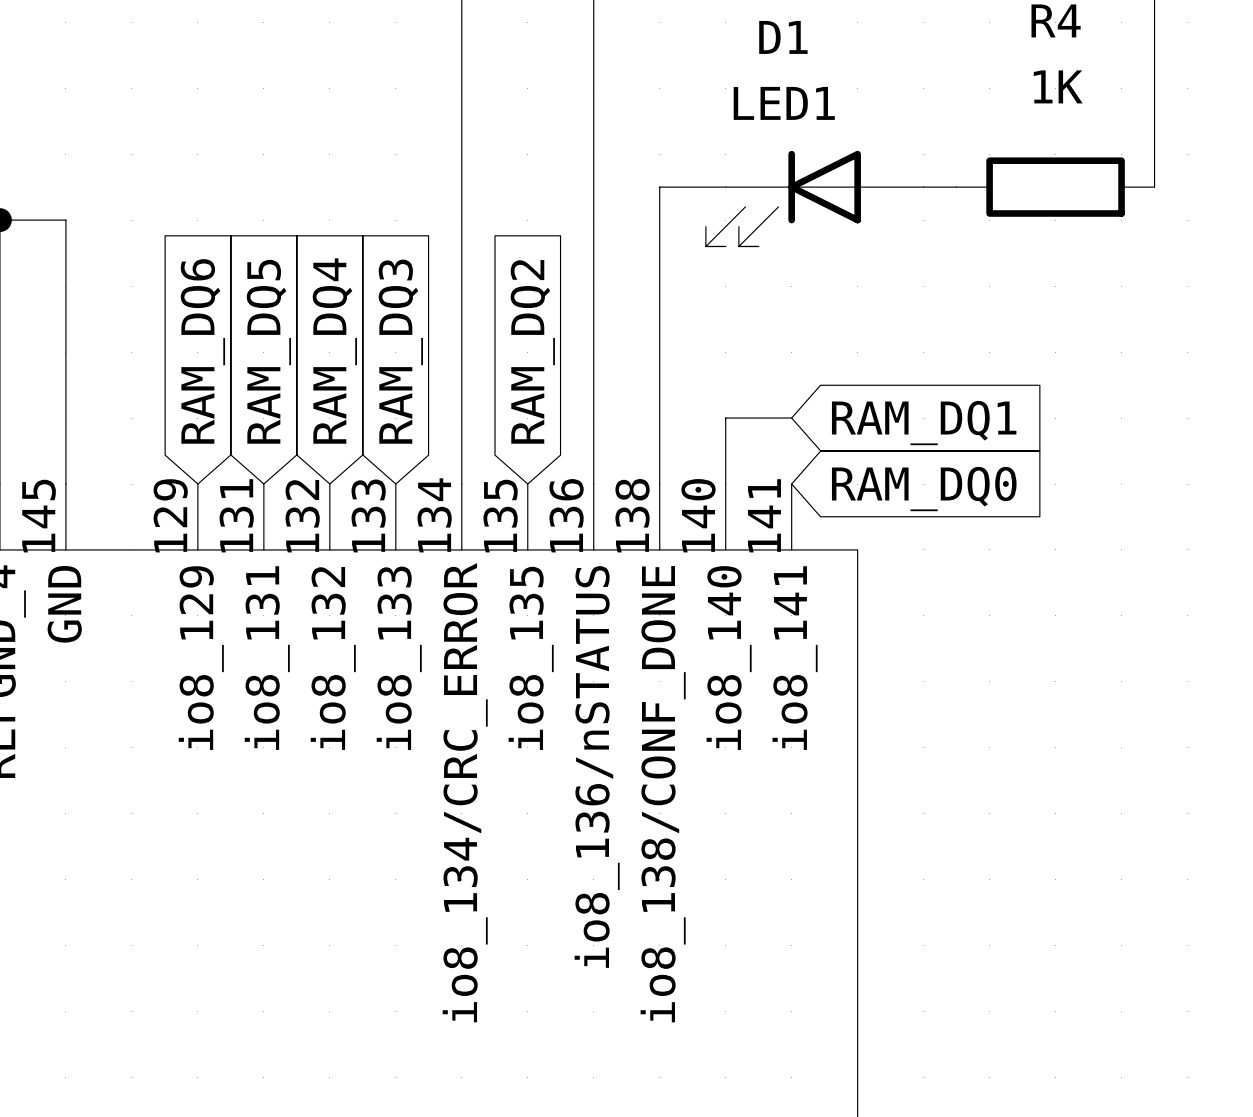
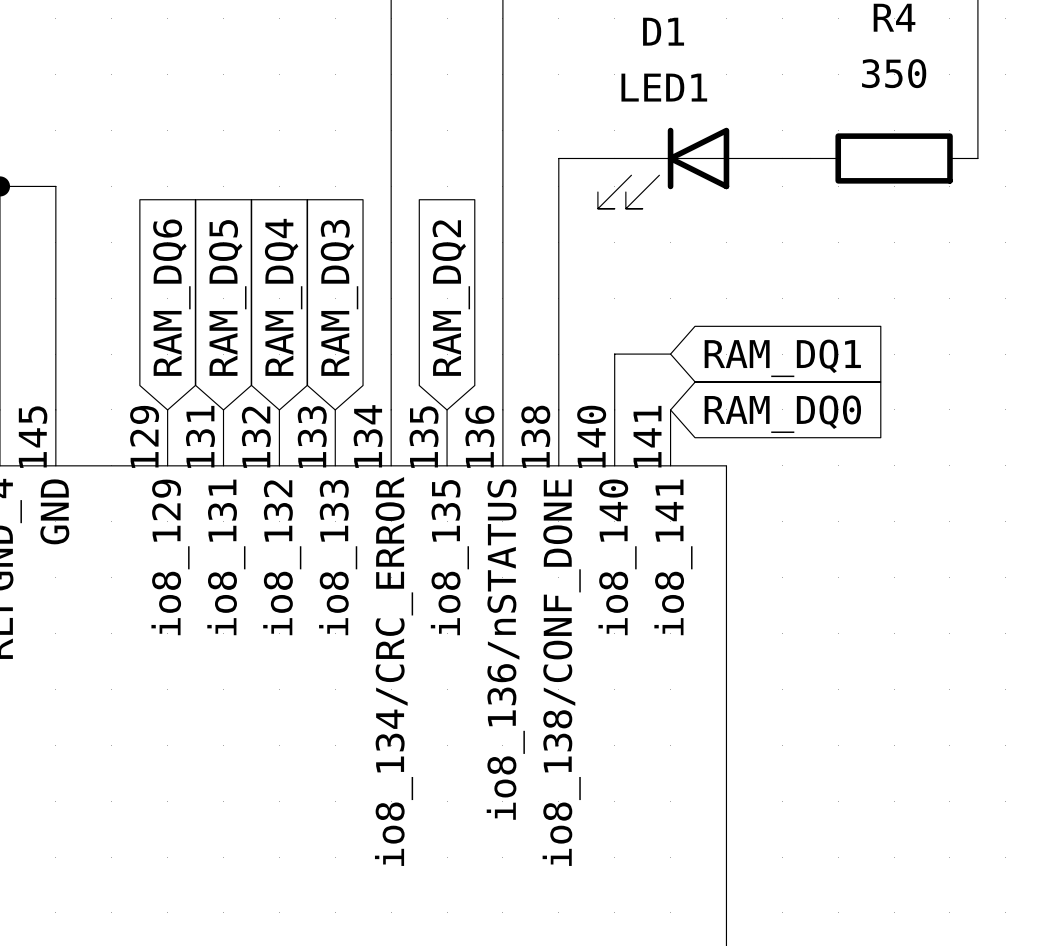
R4 value: 1K (1058, 86) -> 350 (894, 73)

